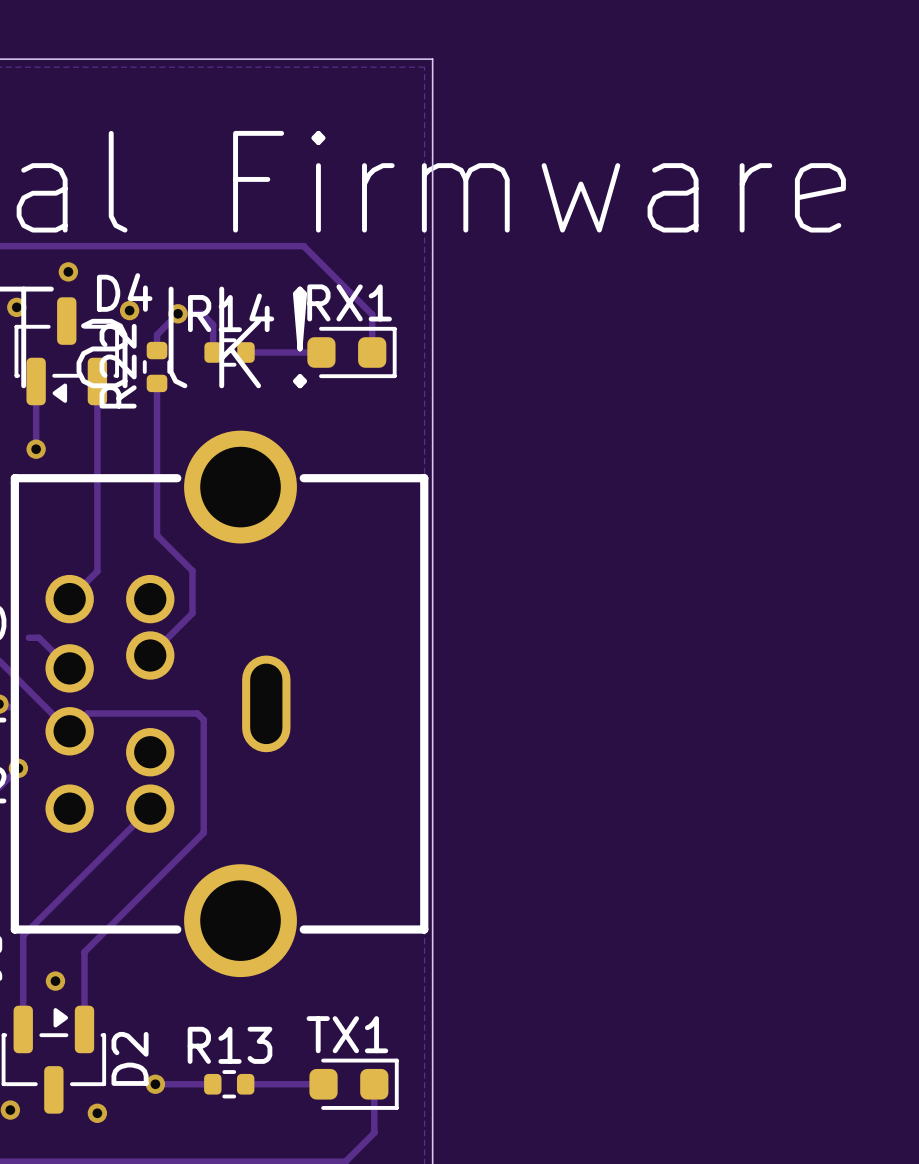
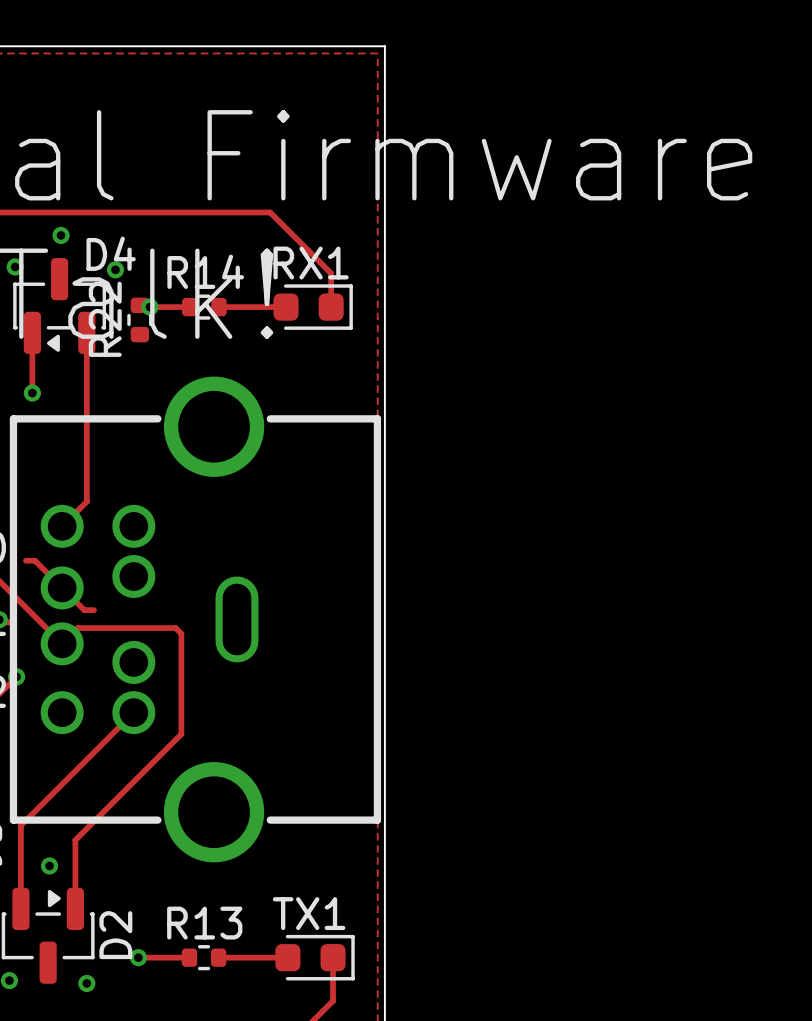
via position: (177, 313) -> (149, 307)
track: (157, 350) (157, 334) (177, 313) (202, 313) (213, 324) (213, 352) -> (149, 307) (189, 307)
track: (157, 383) (157, 535) (192, 570) (192, 613) (150, 655) -> none
track: none -> (62, 587) (84, 610) (94, 610)

